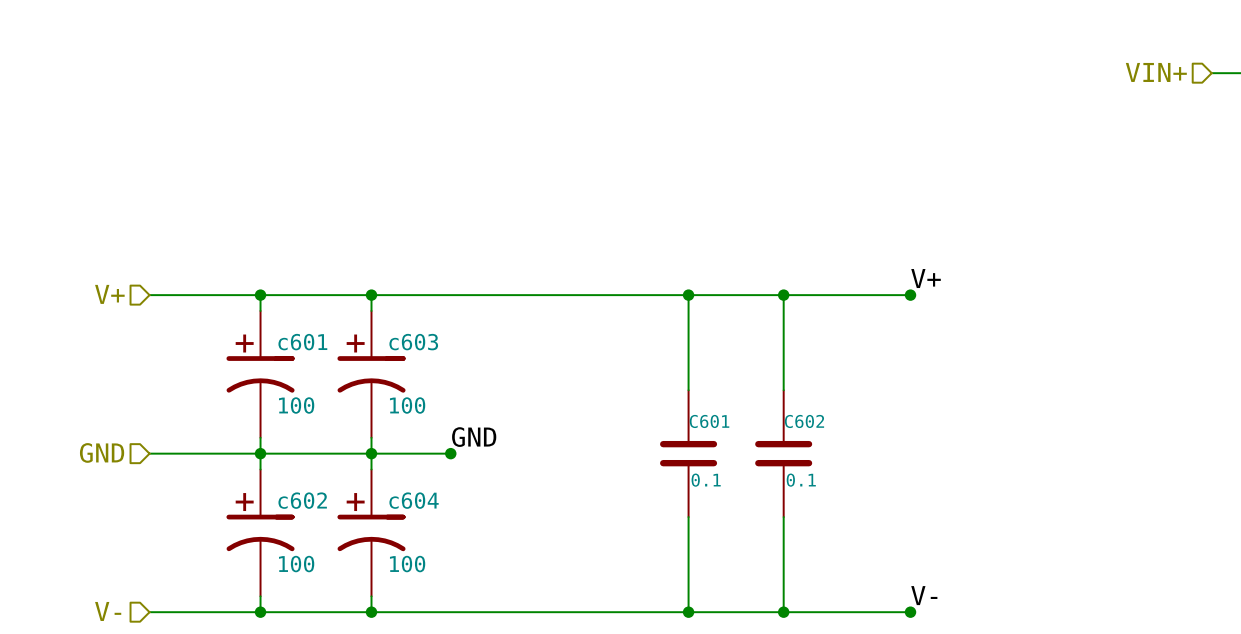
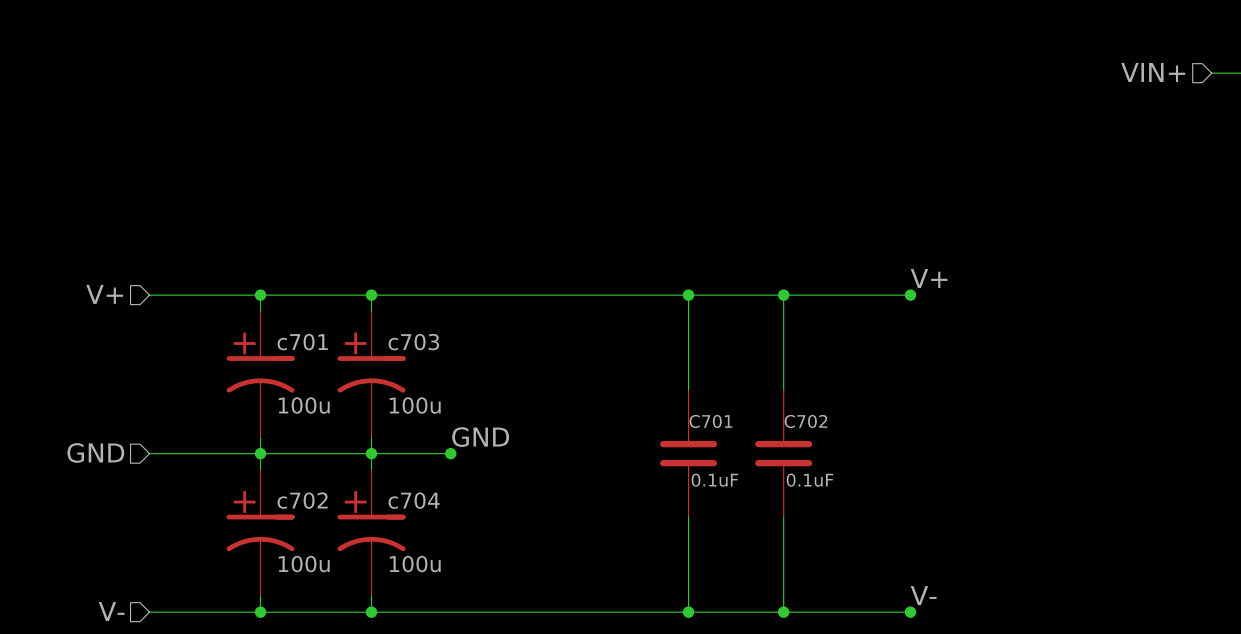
c601 name: c601 (302, 342) -> c701 (302, 342)
c603 name: c603 (413, 342) -> c703 (413, 342)
c601 value: 100 (296, 405) -> 100u (304, 405)
c603 value: 100 (407, 405) -> 100u (415, 405)
C601 name: C601 (709, 421) -> C701 (710, 421)
C602 name: C602 (804, 421) -> C702 (805, 421)
C601 value: 0.1 (706, 480) -> 0.1uF (714, 480)
C602 value: 0.1 (801, 480) -> 0.1uF (810, 480)
c602 name: c602 (302, 500) -> c702 (302, 500)
c604 name: c604 (414, 500) -> c704 (414, 500)
c602 value: 100 (296, 564) -> 100u (304, 564)
c604 value: 100 (407, 564) -> 100u (415, 564)

